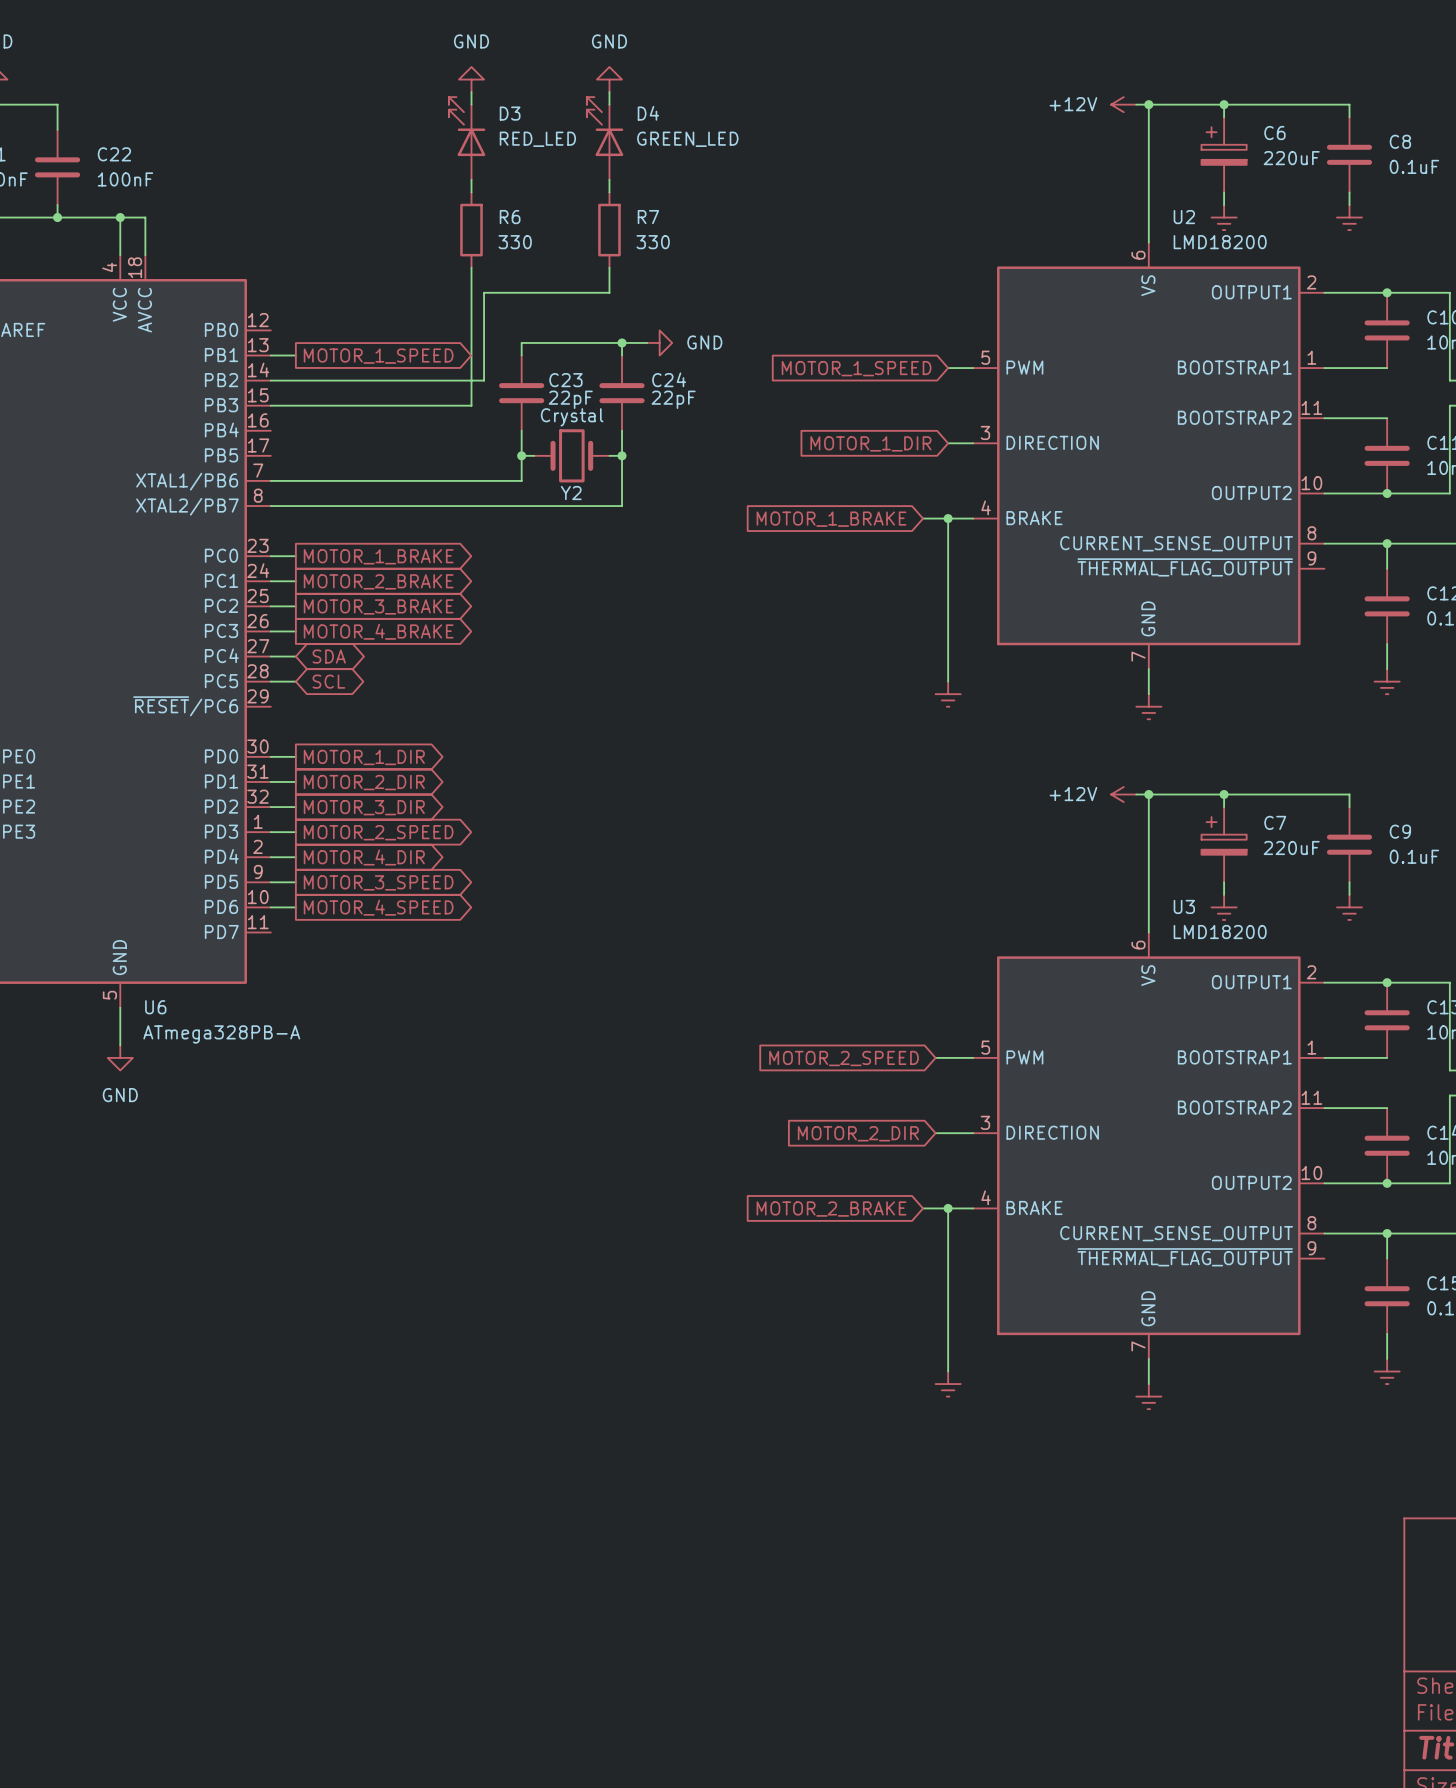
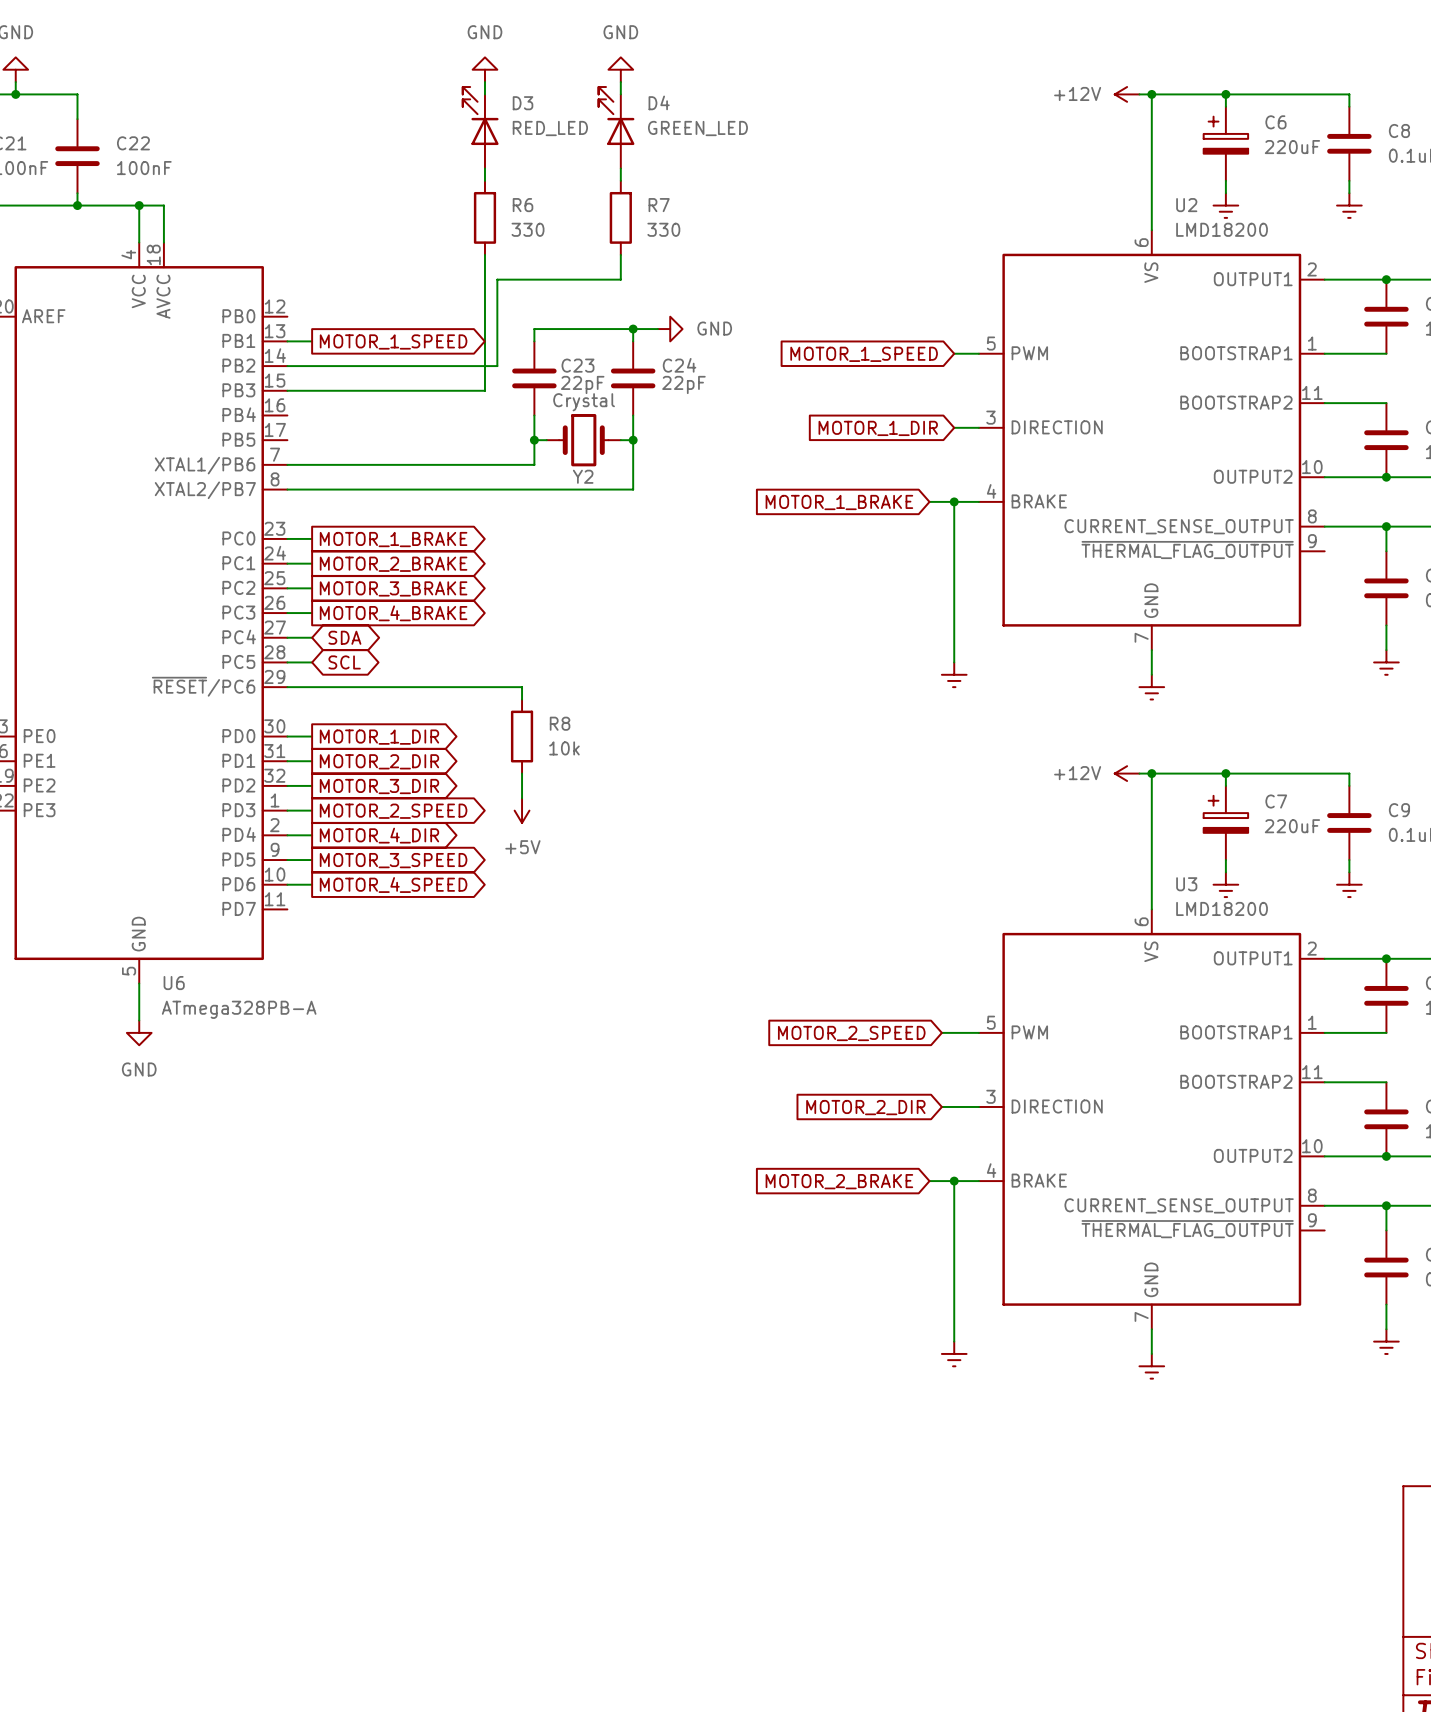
wire: none -> (287, 687) (522, 687) (522, 699)
R8: none -> 10k (522, 736)
wire: none -> (522, 773) (522, 798)
power symbol: none -> +5V (522, 810)

